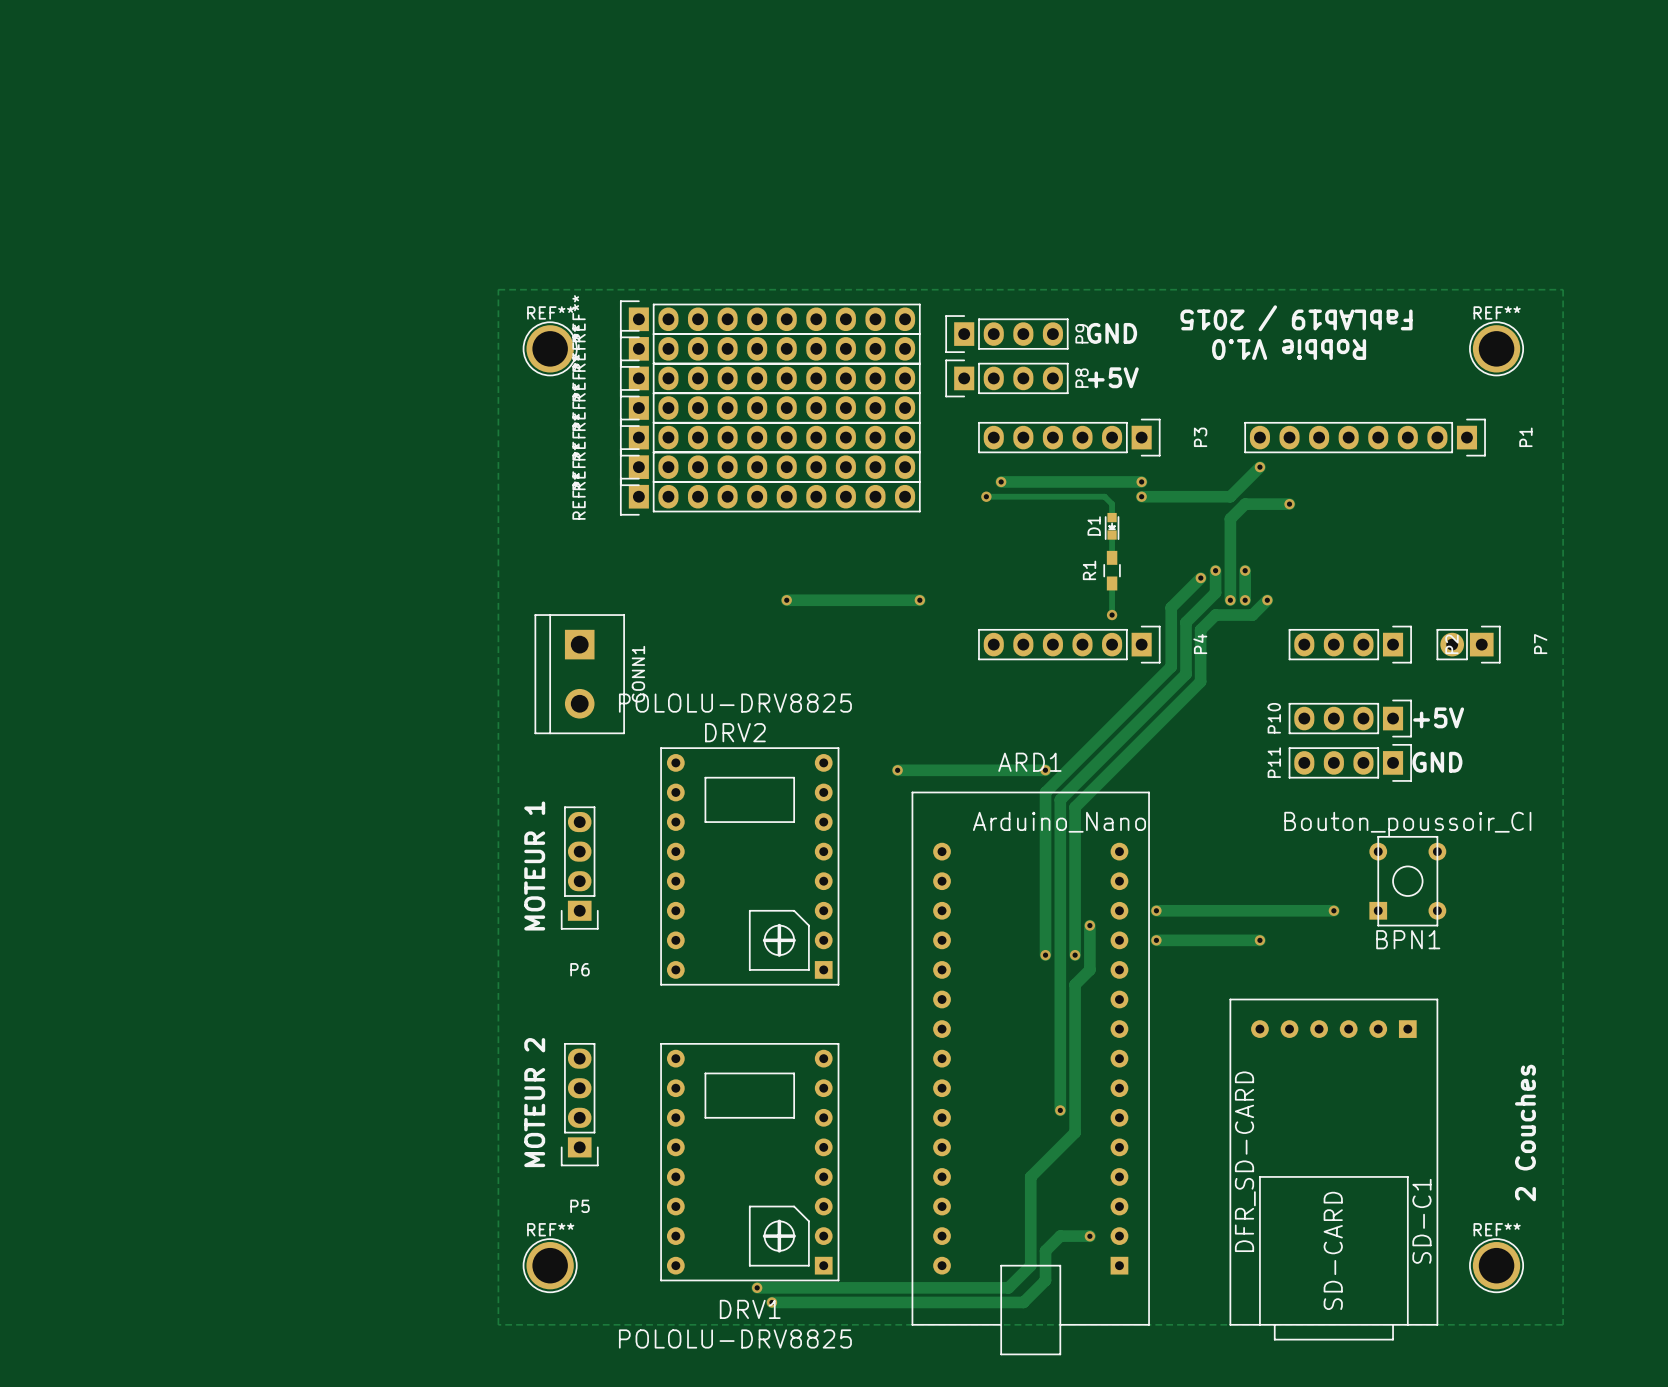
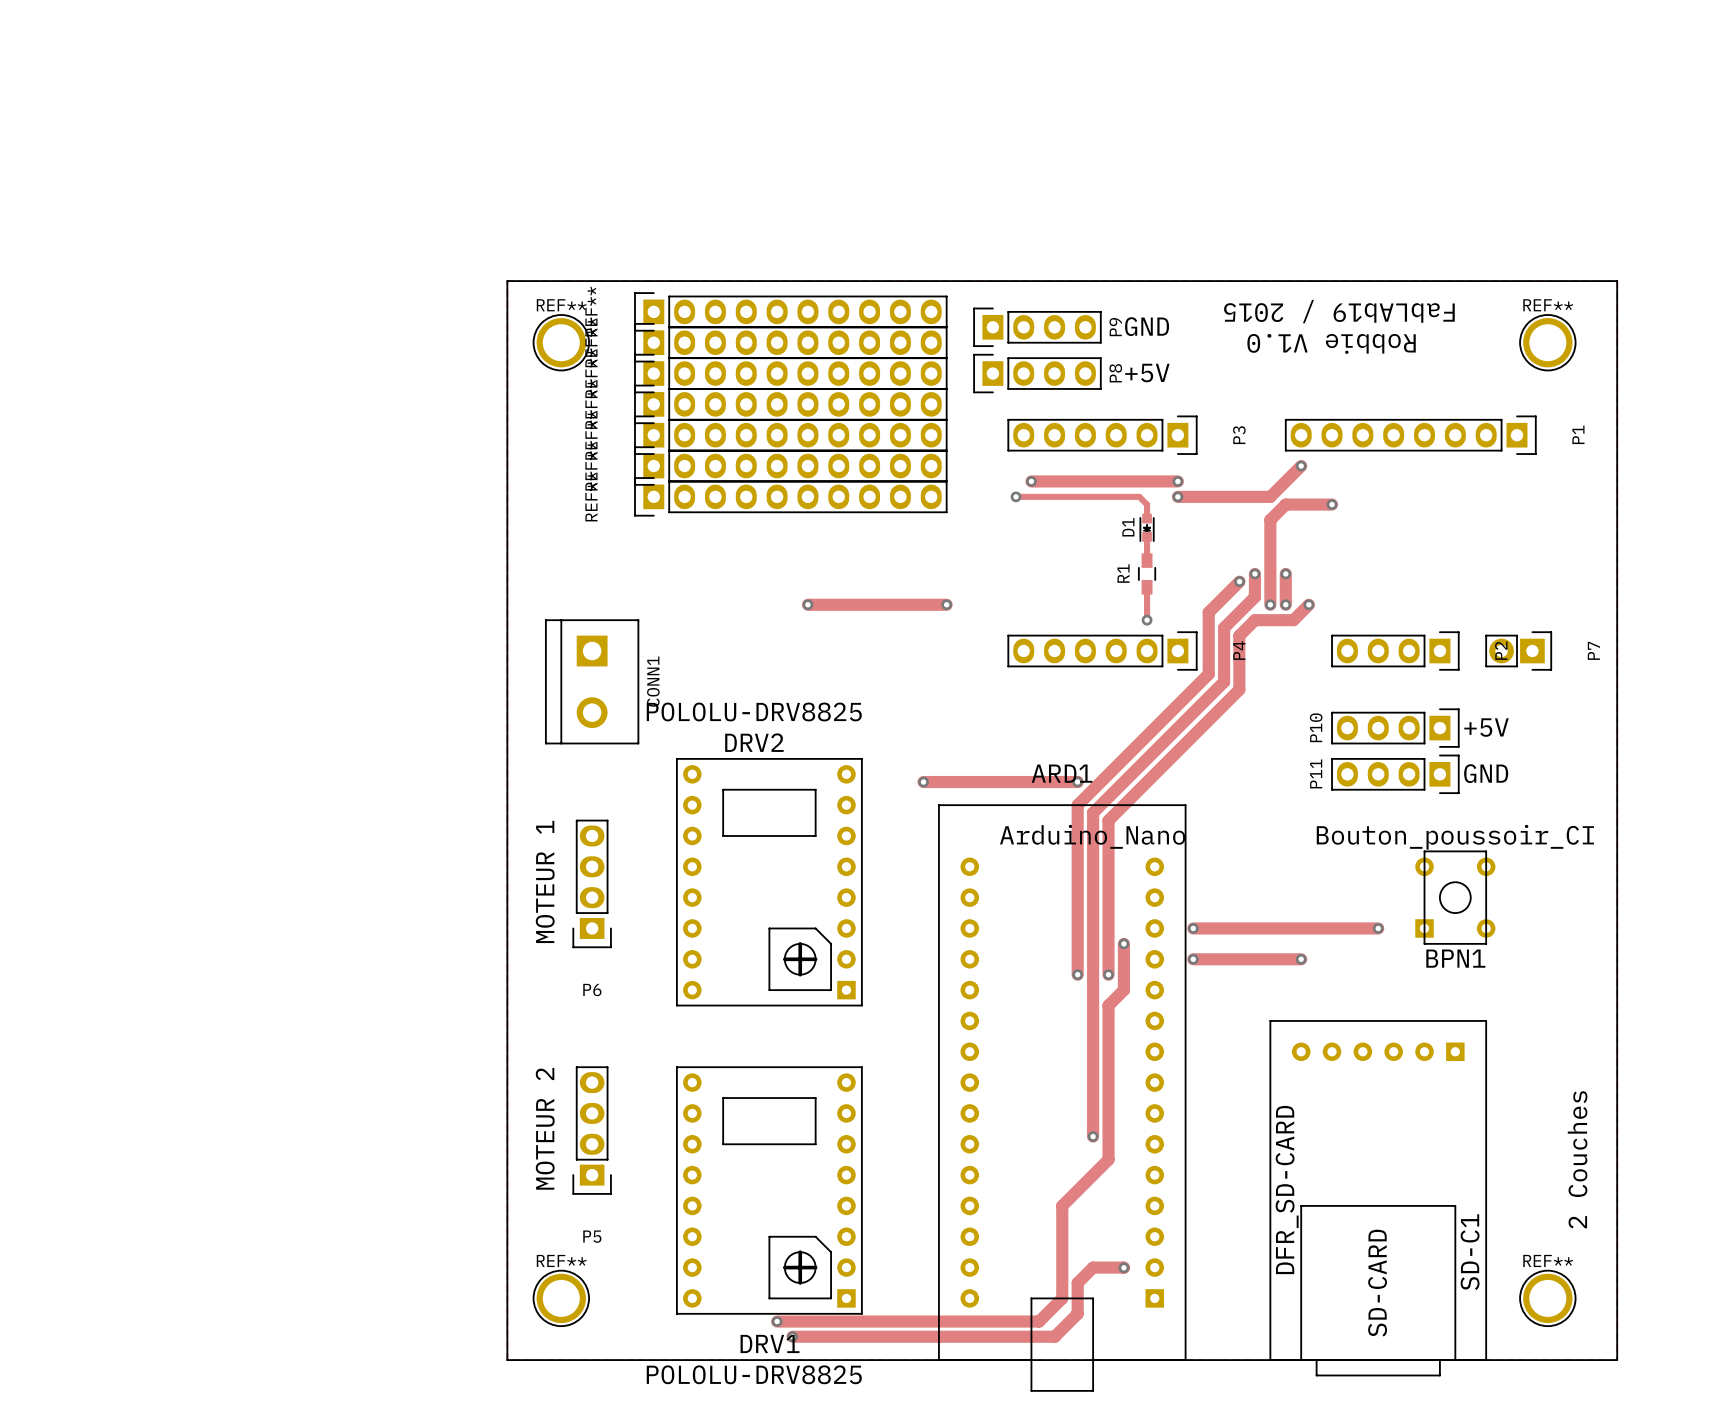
board edge: none -> (507, 281) (507, 1360) (1617, 1360) (1617, 281) (507, 281)

